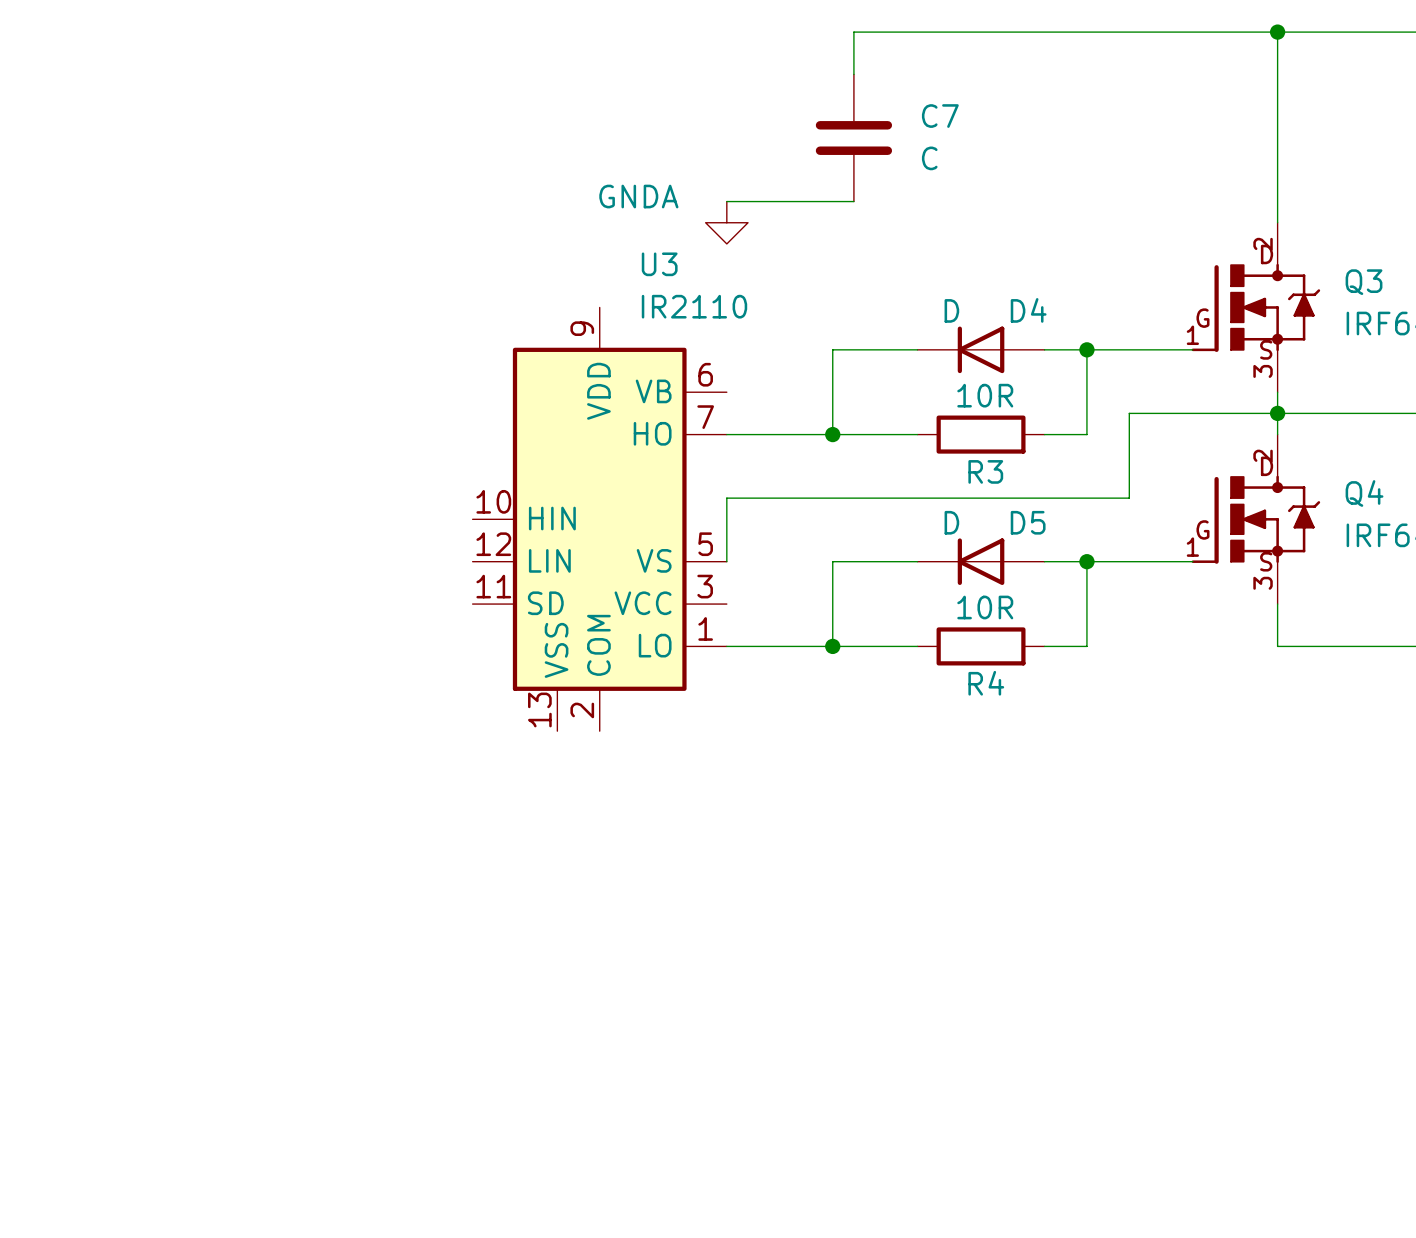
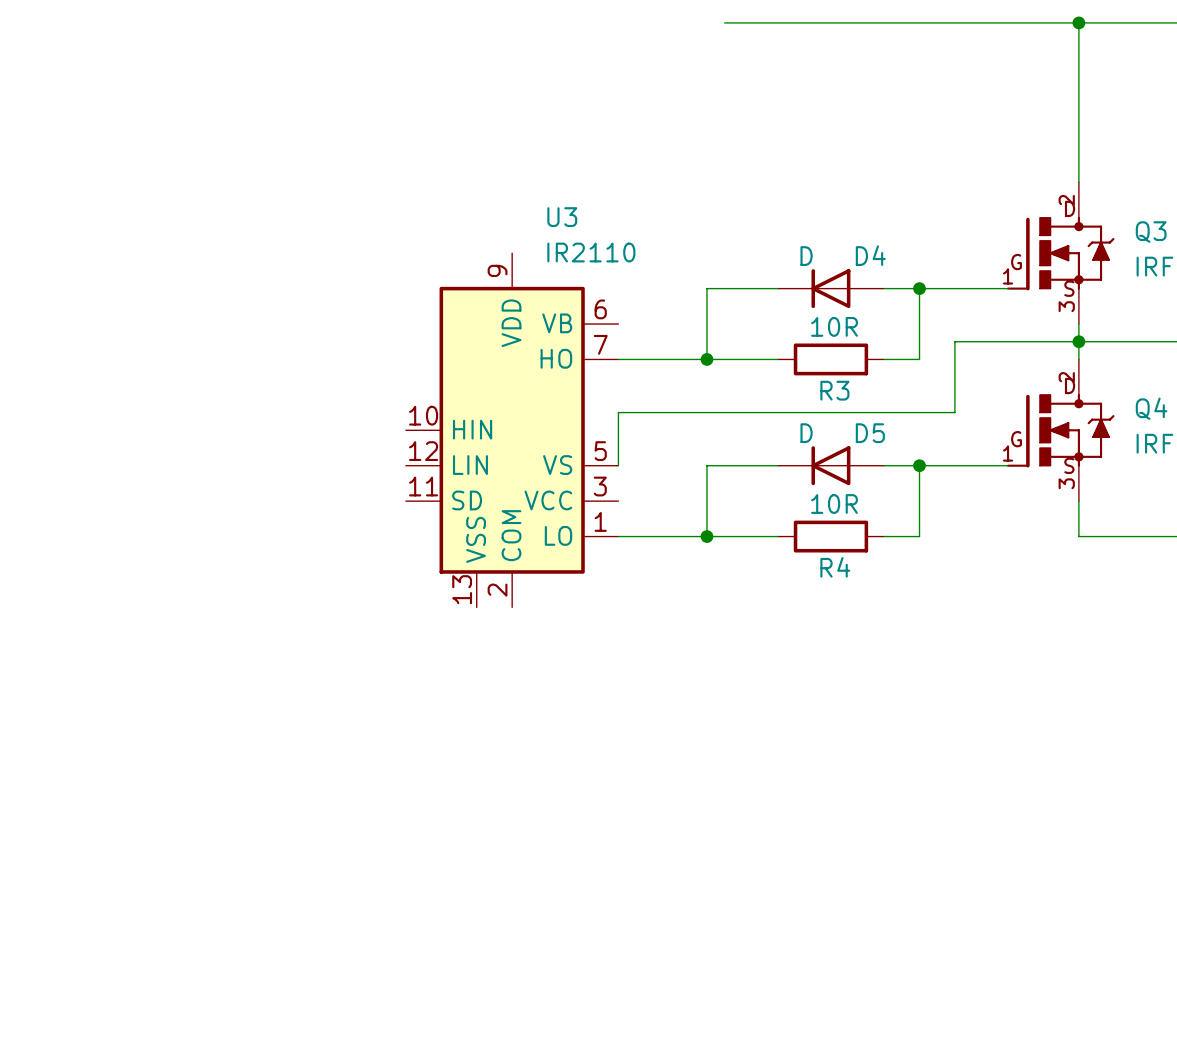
wire: (853, 32) (853, 74) -> none
C7: C (853, 138) -> none
wire: (726, 201) (853, 201) -> none
power symbol: GNDA (726, 222) -> none

